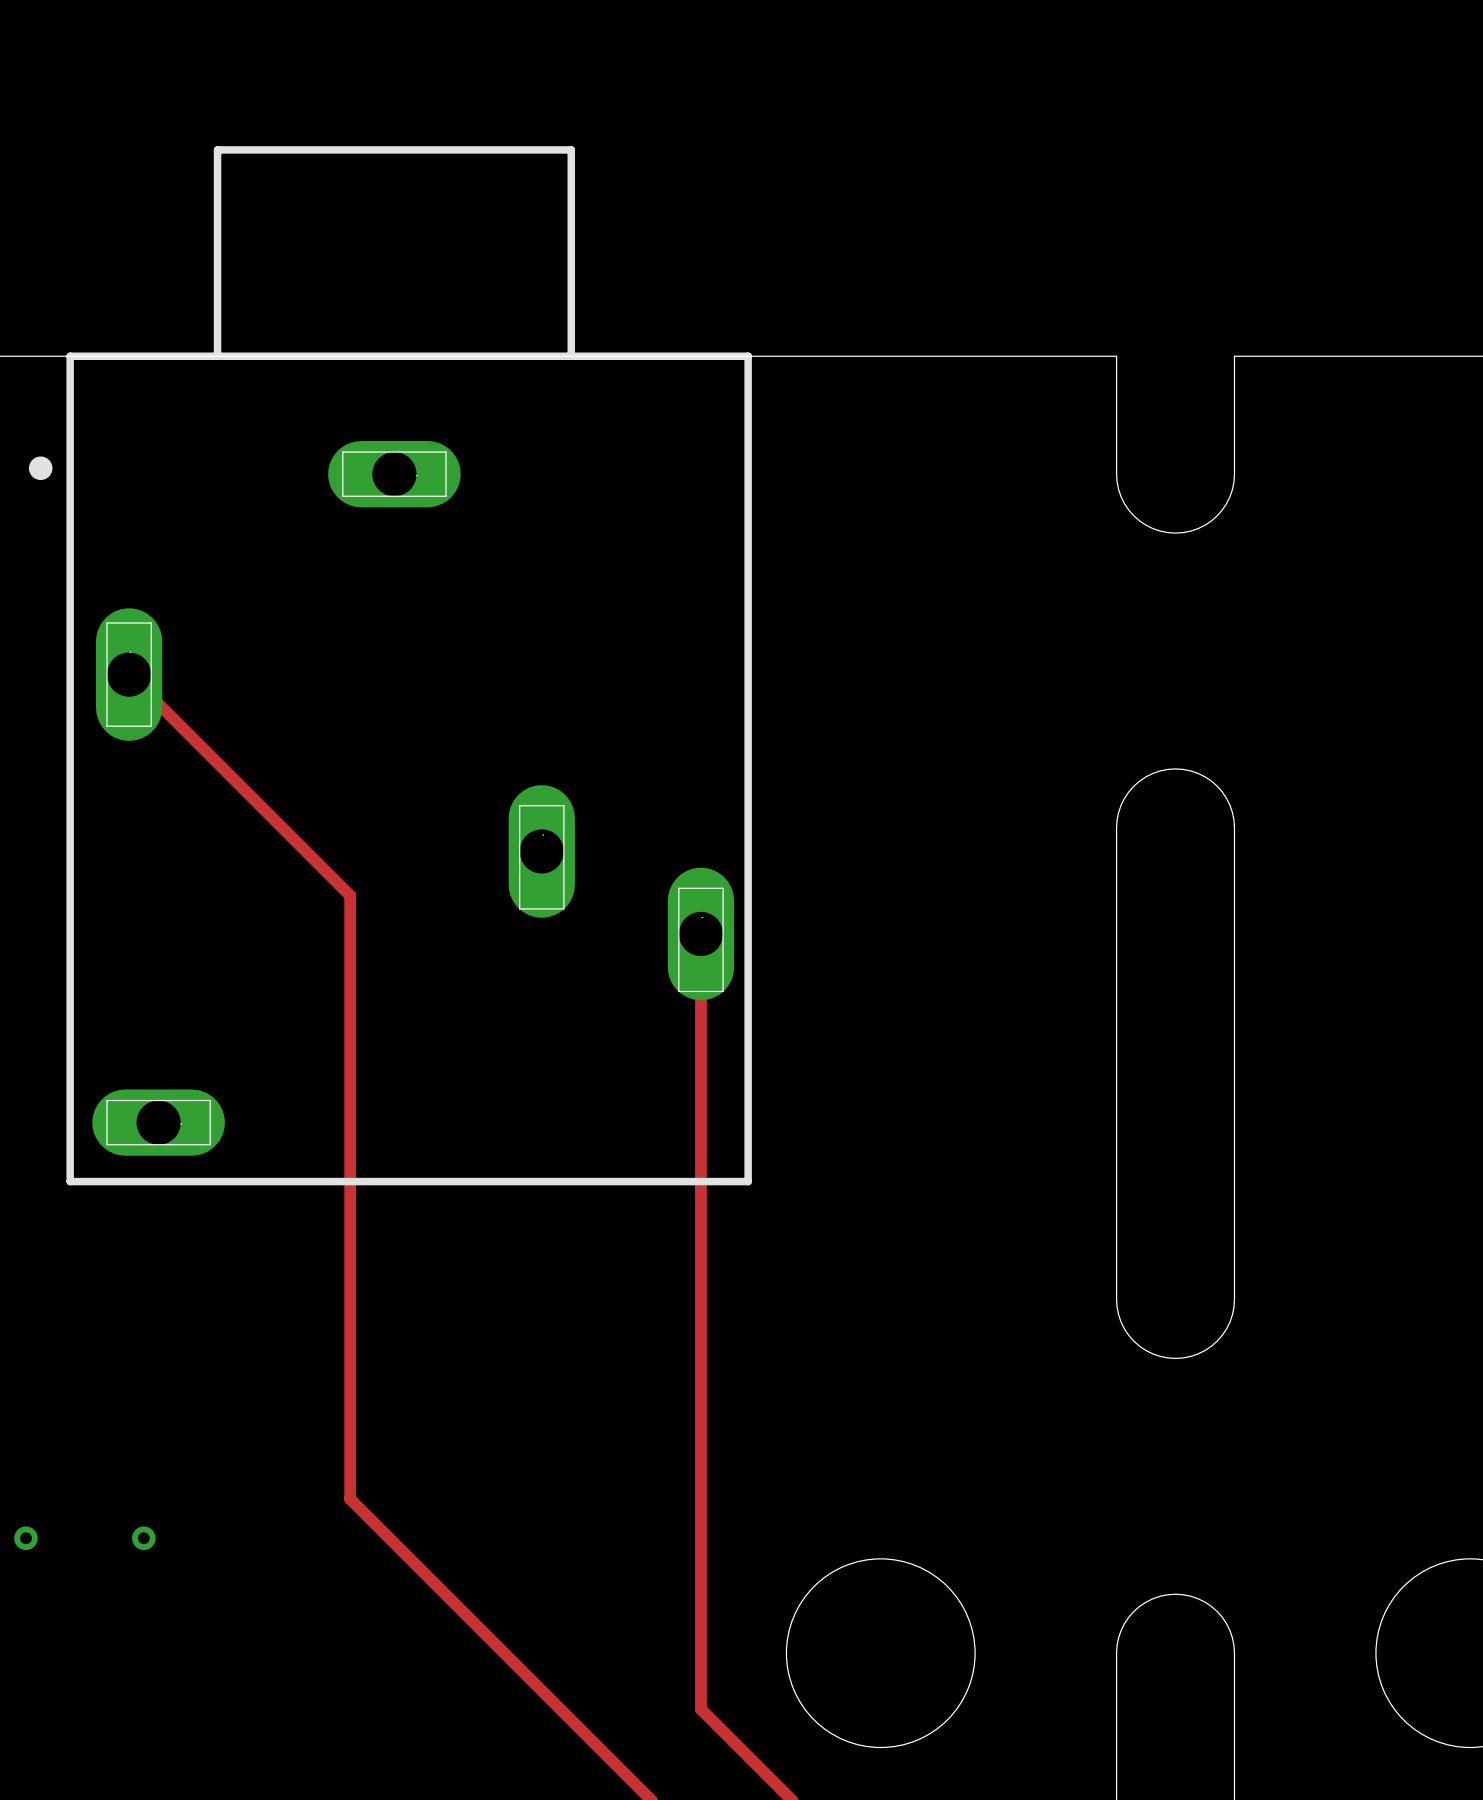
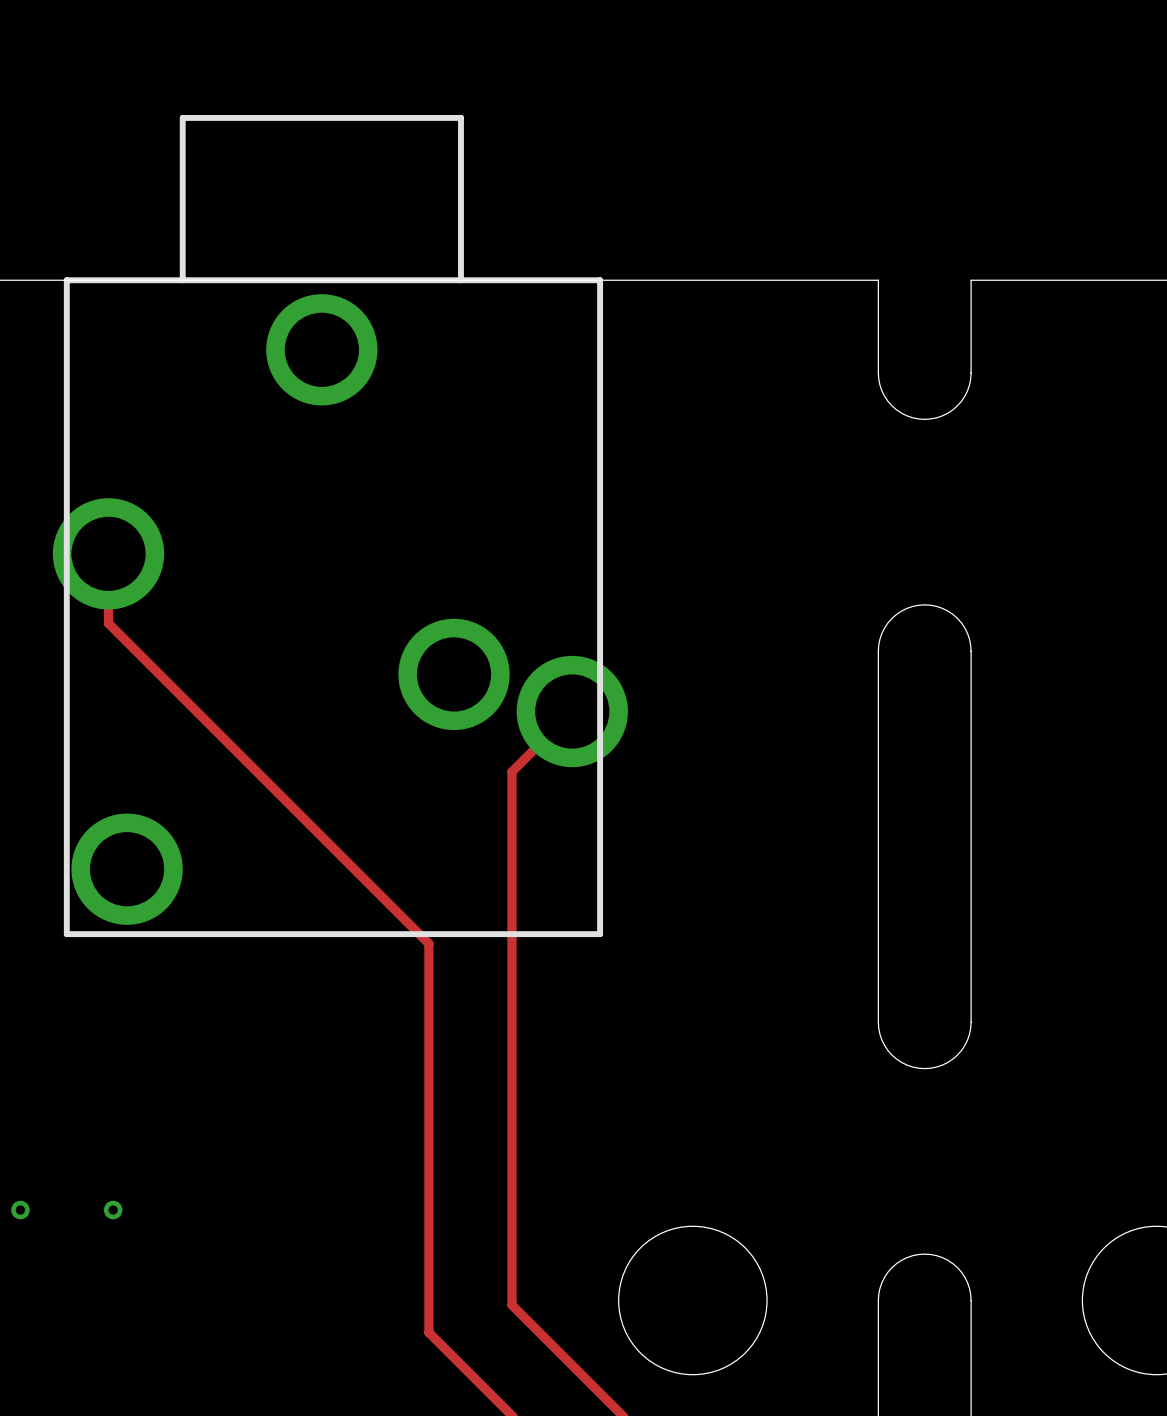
part footprint: [28, 146, 752, 1186] -> [52, 114, 628, 938]
track: (129, 674) (350, 895) (350, 1498) (545, 1693) -> (108, 553) (108, 623) (428, 943) (428, 1332)
track: (700, 933) (700, 1709) -> (572, 711) (511, 771) (511, 1305) (551, 1344)

